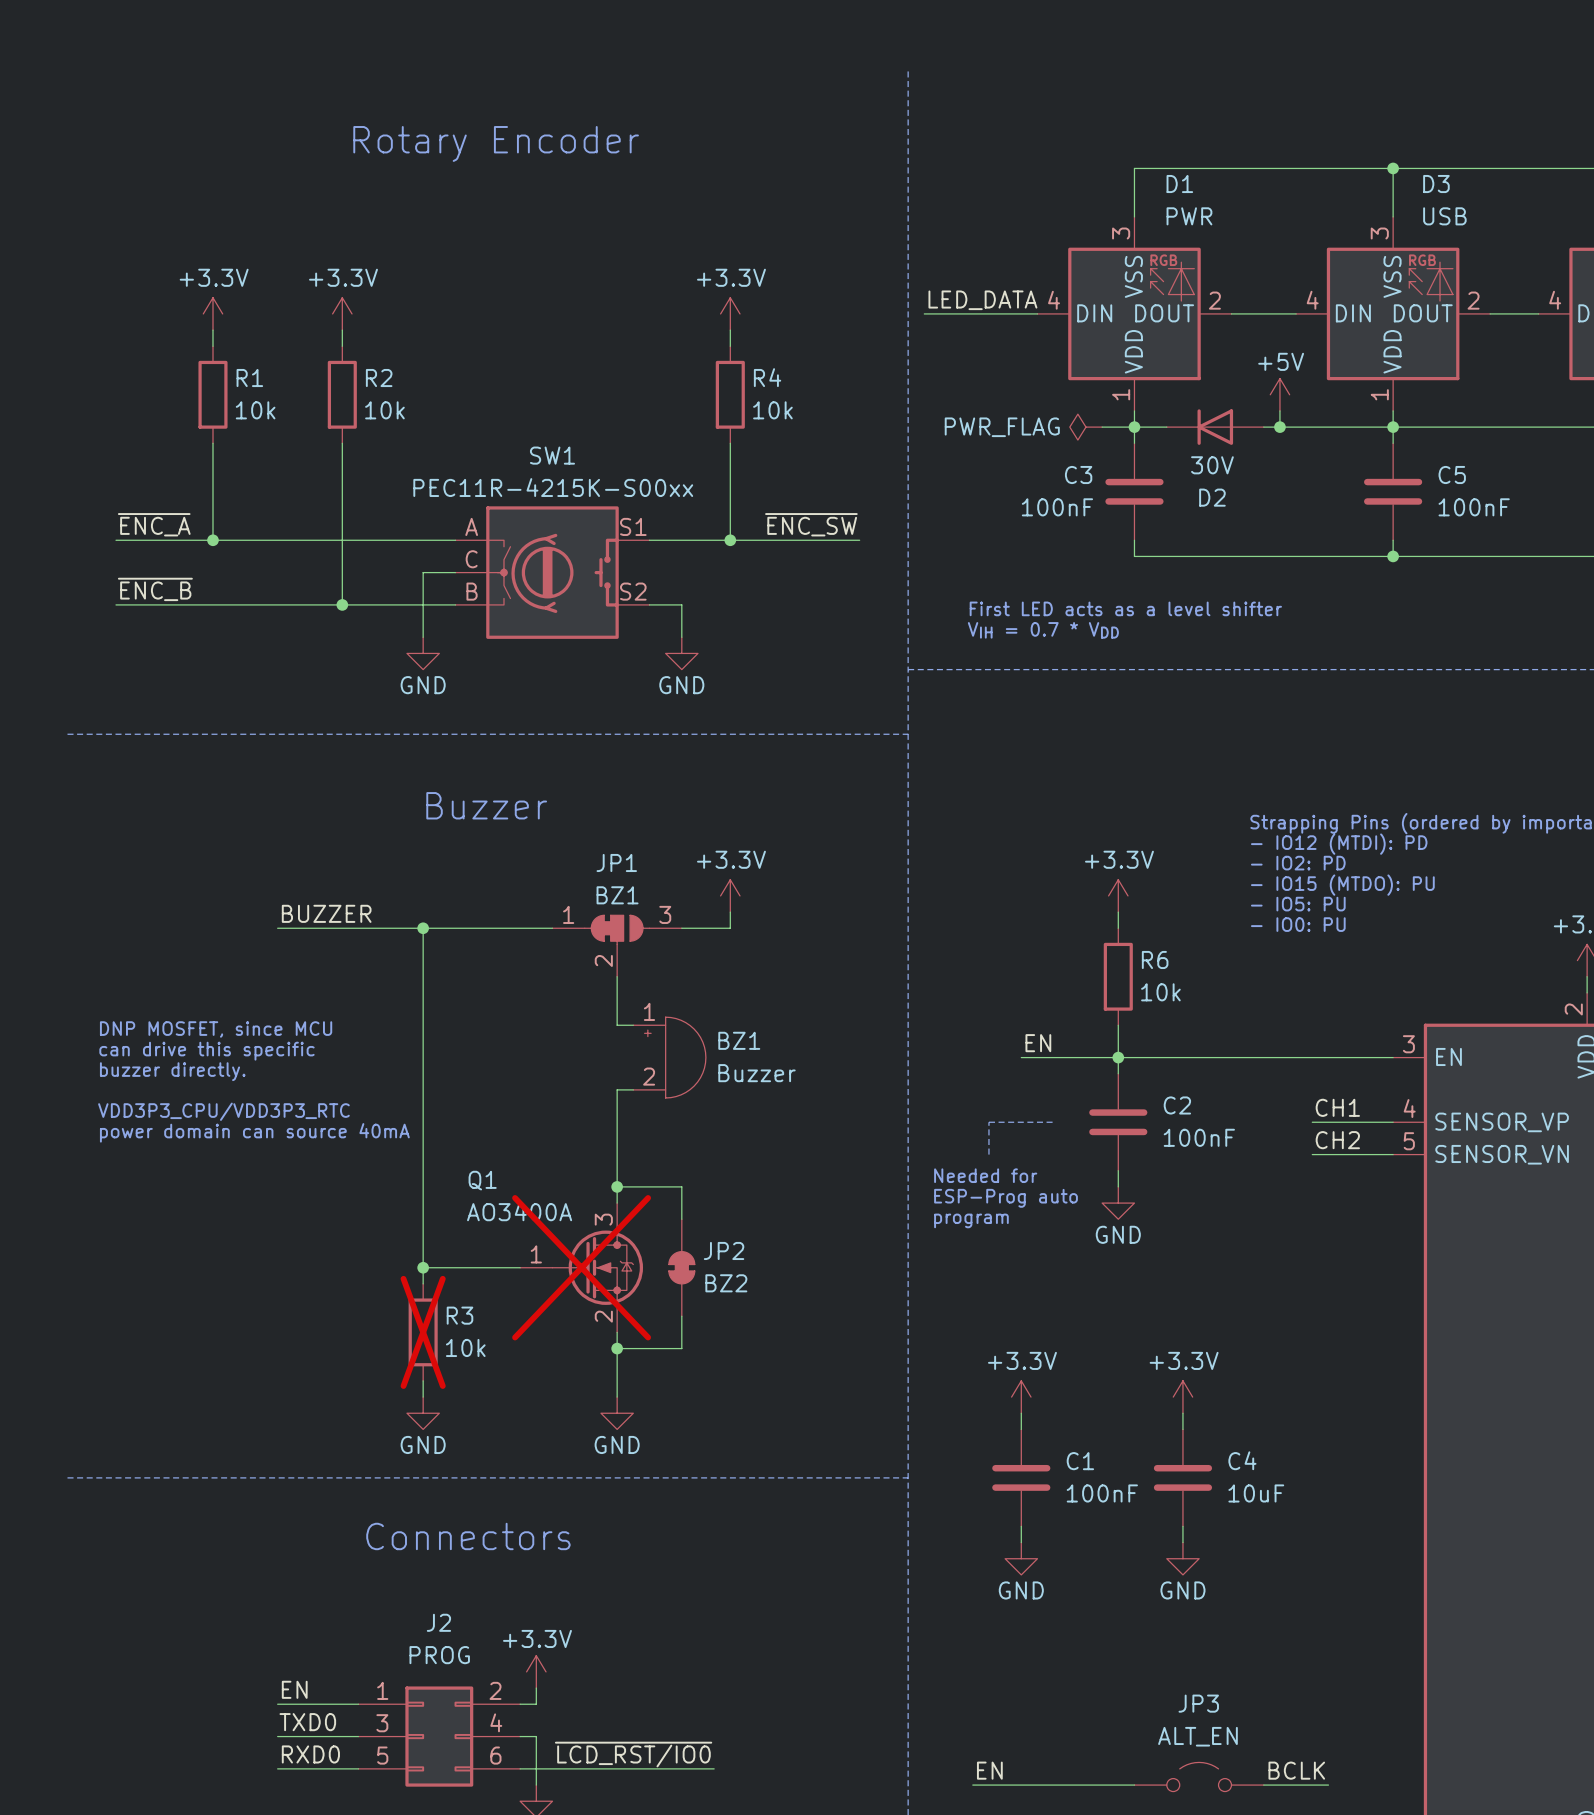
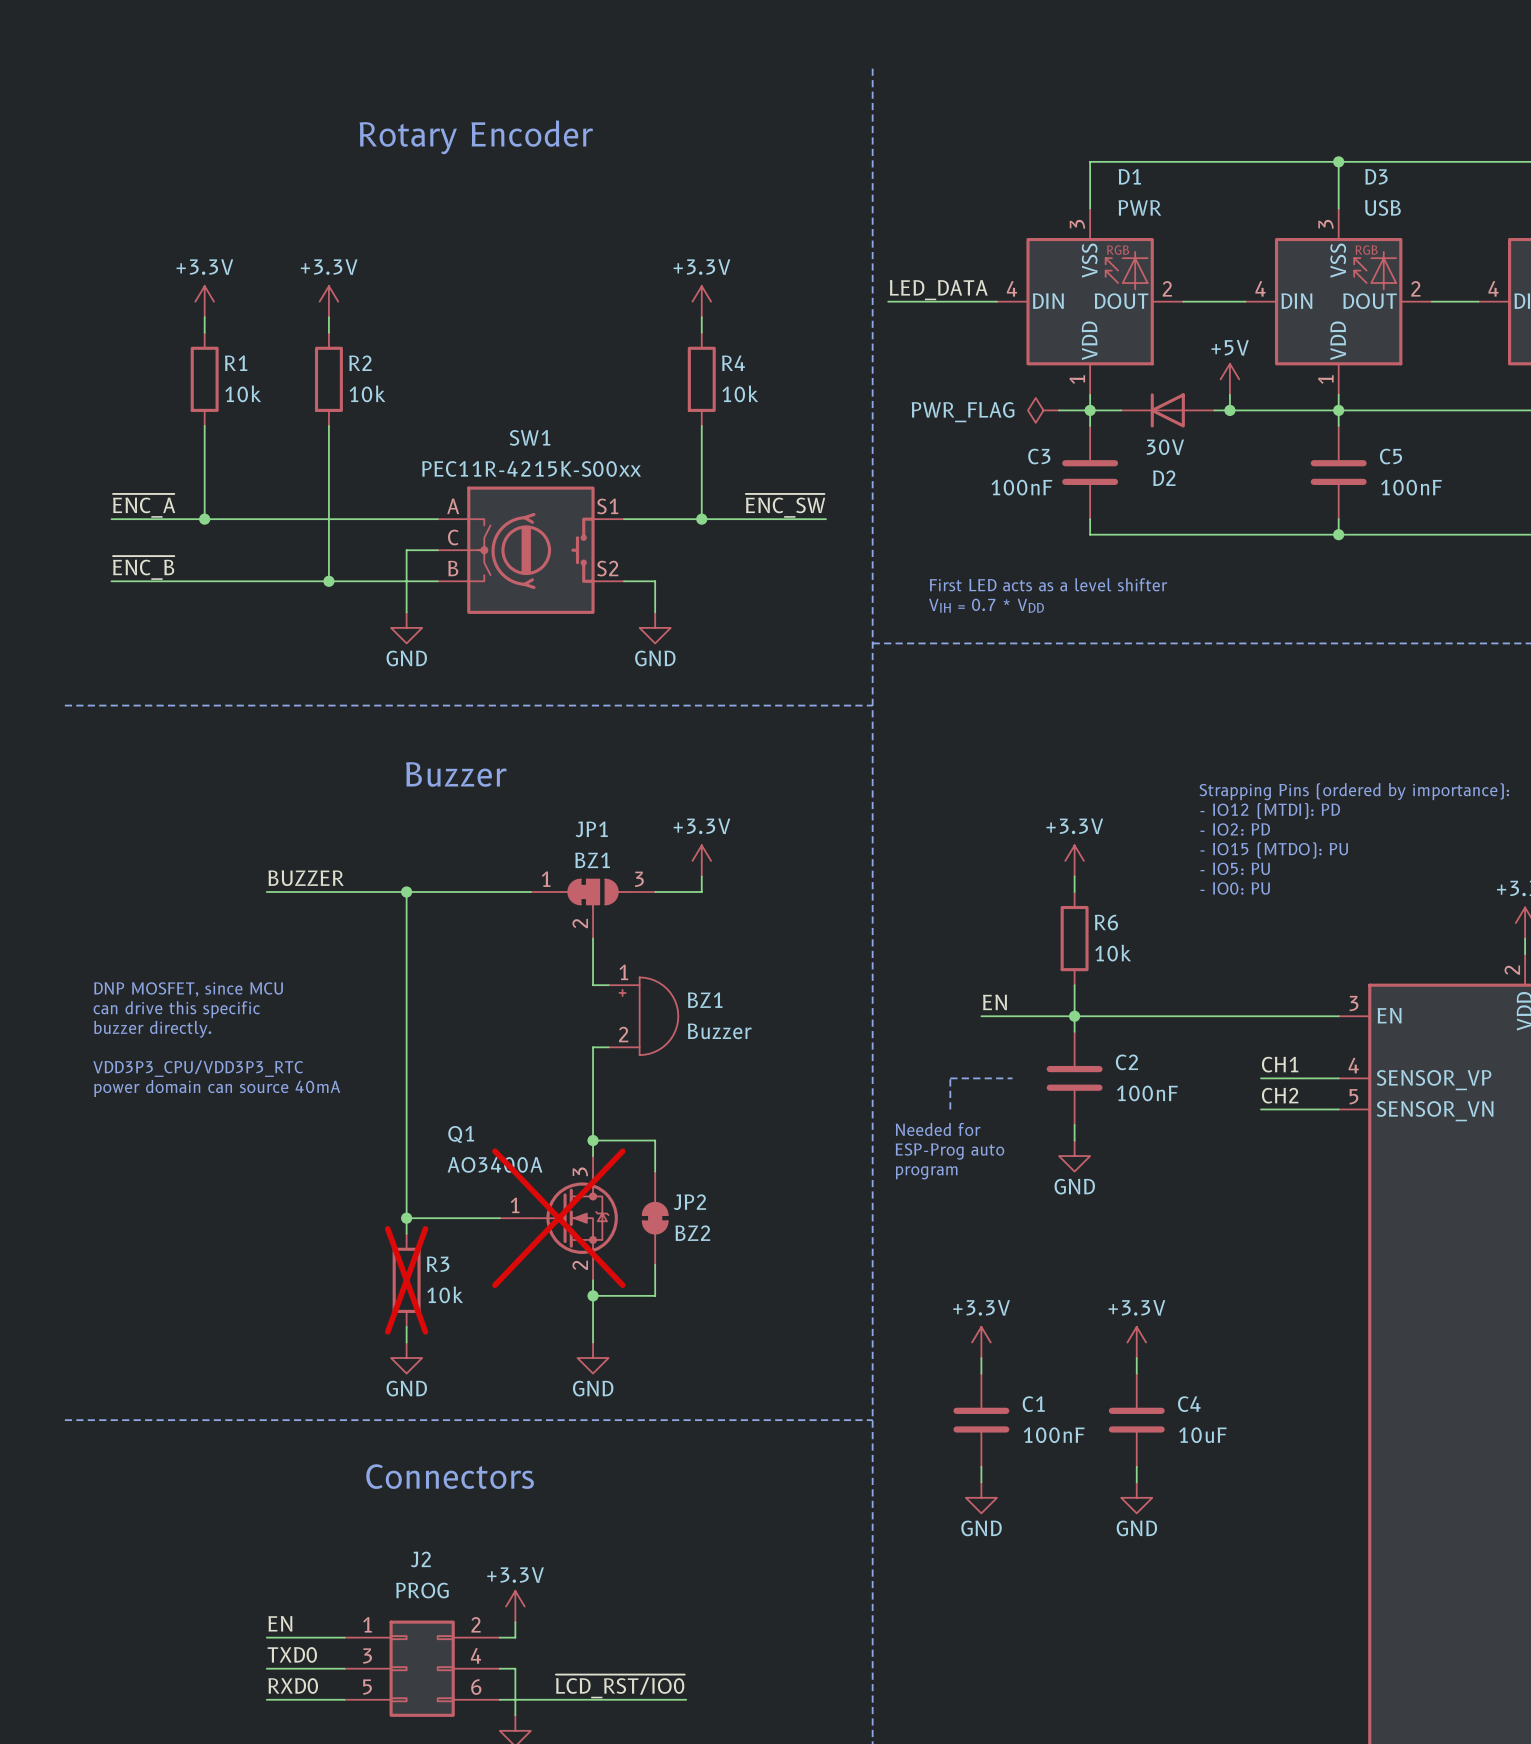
label: EN (989, 1770) -> none
label: BCLK (1296, 1770) -> none
JP3: ALT_EN (1199, 1776) -> none
wire: (972, 1785) (1134, 1785) -> none
wire: (1263, 1785) (1328, 1785) -> none

